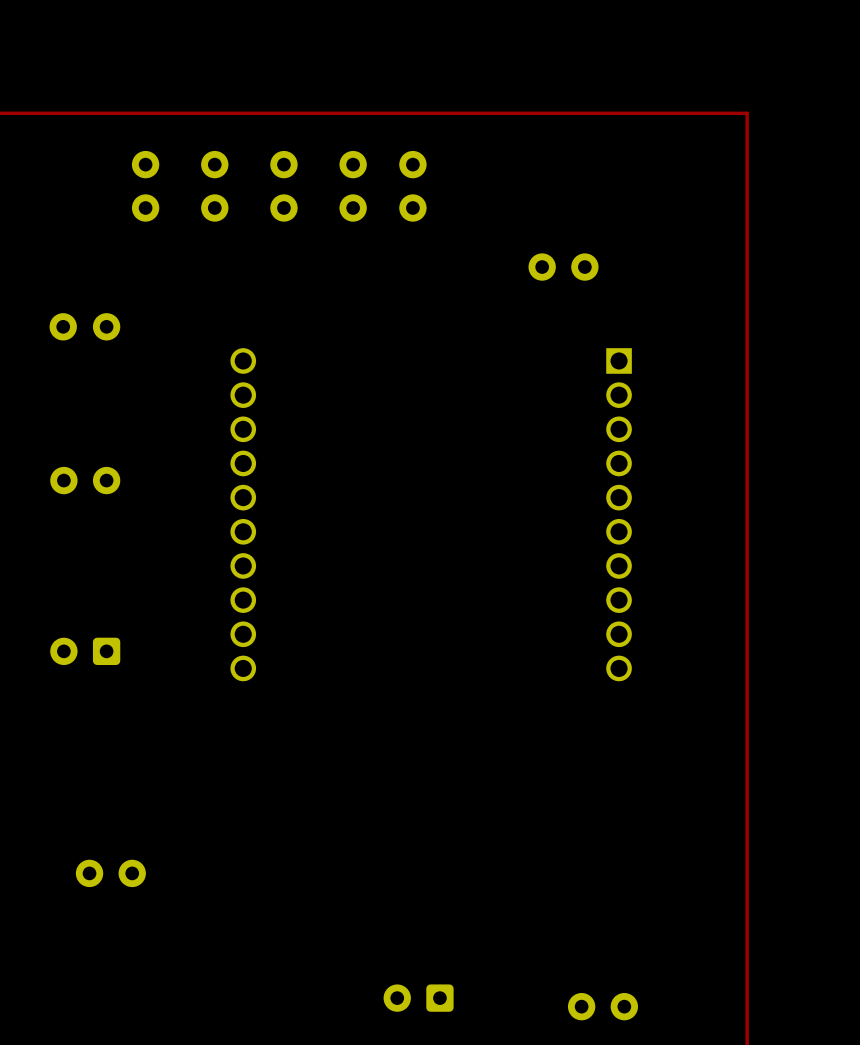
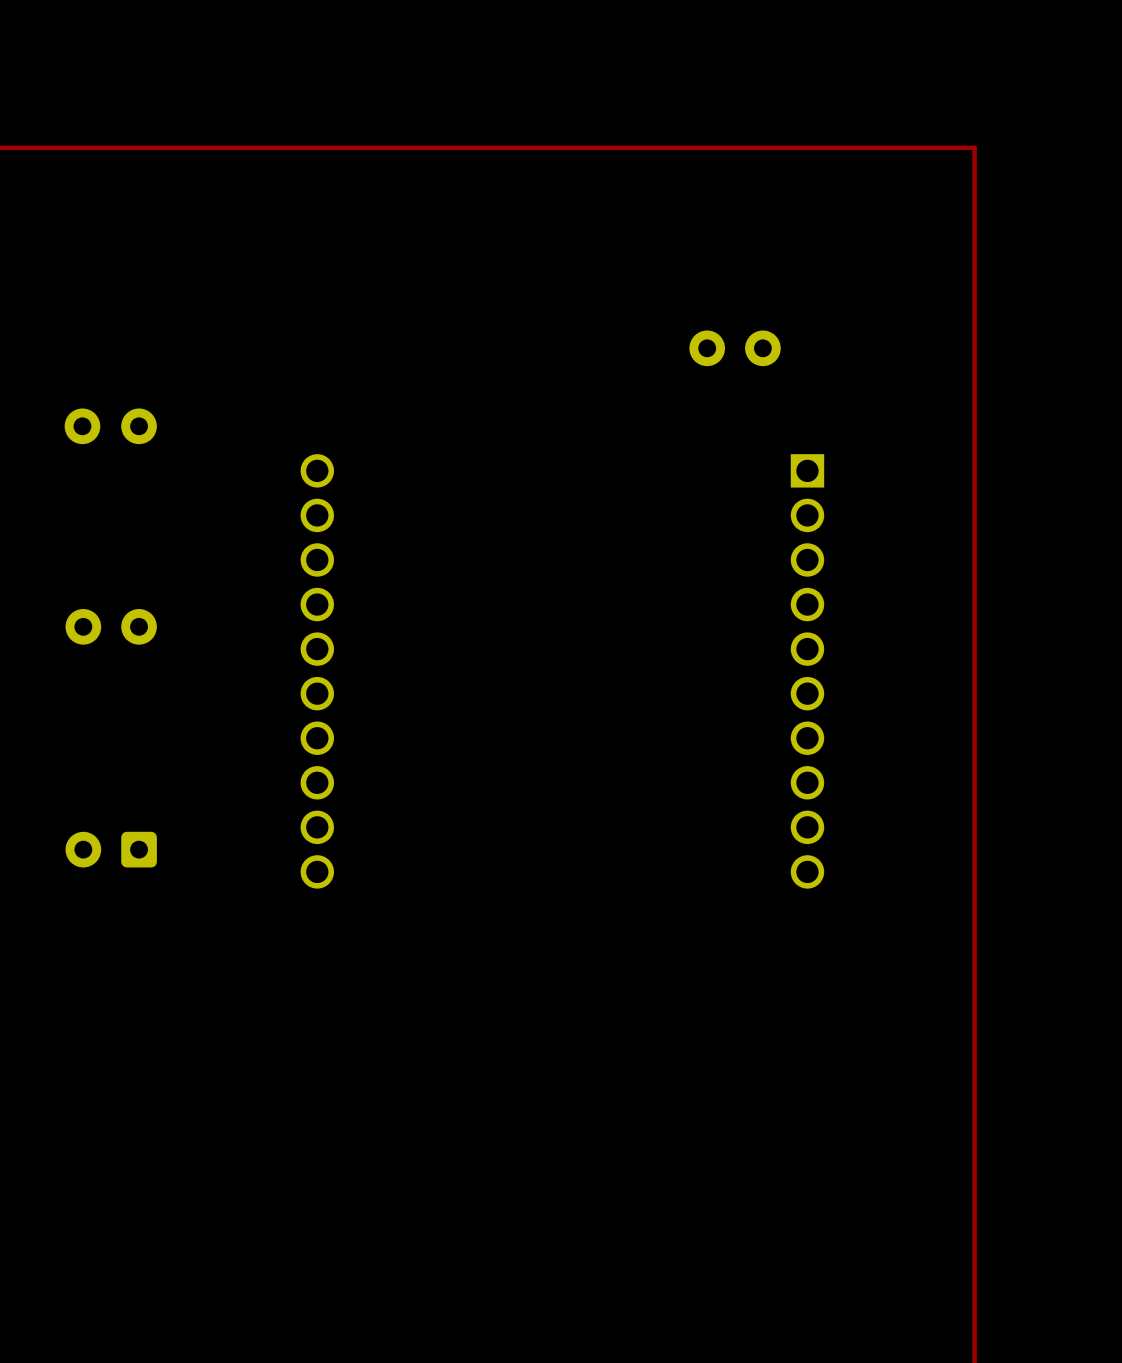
part: (145, 186) -> none
part: (214, 186) -> none
part: (283, 186) -> none
part: (353, 186) -> none
part: (412, 186) -> none
part: (110, 873) -> none
part: (418, 998) -> none
part: (602, 1006) -> none

